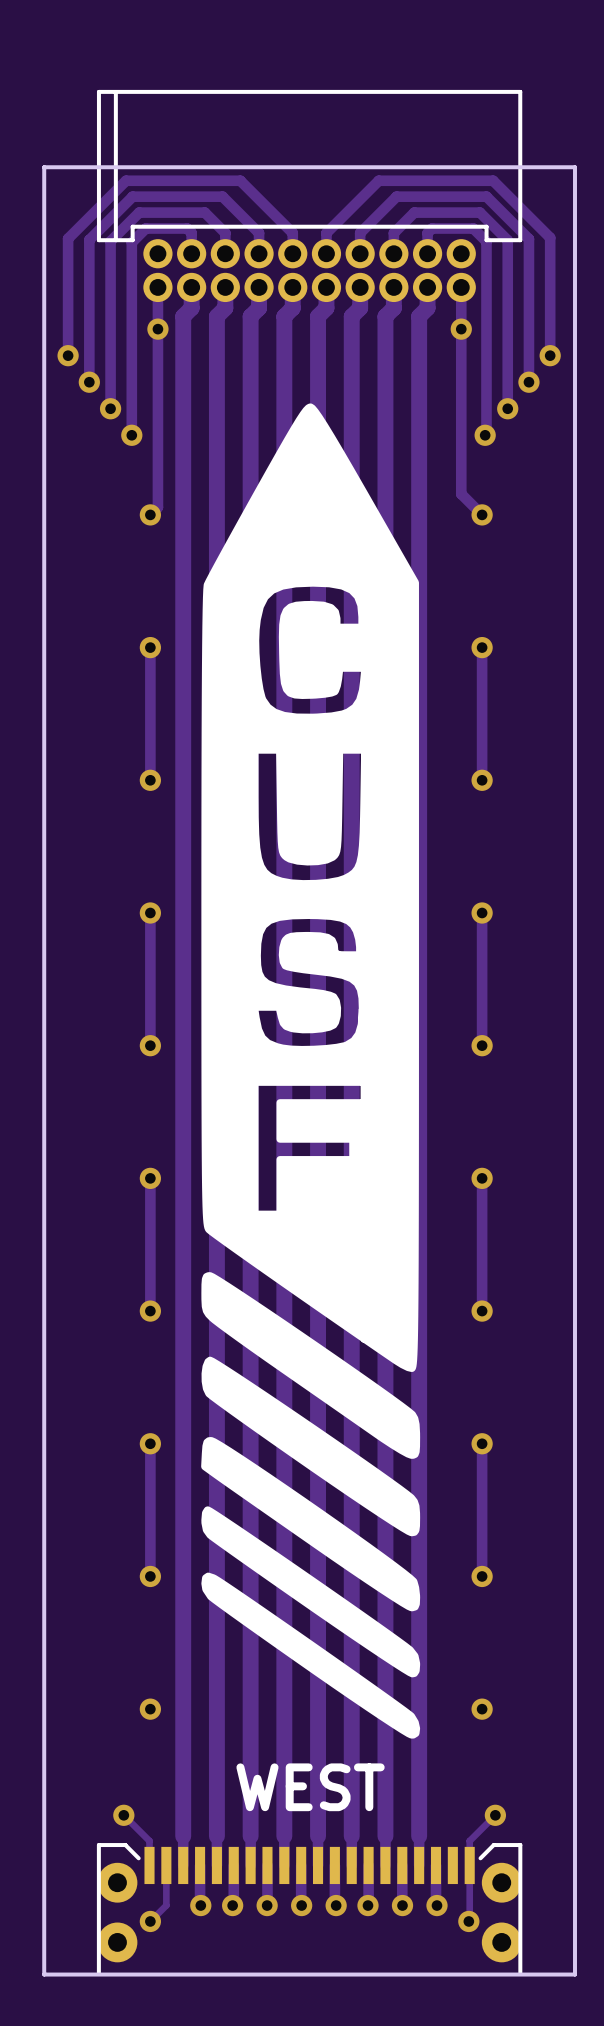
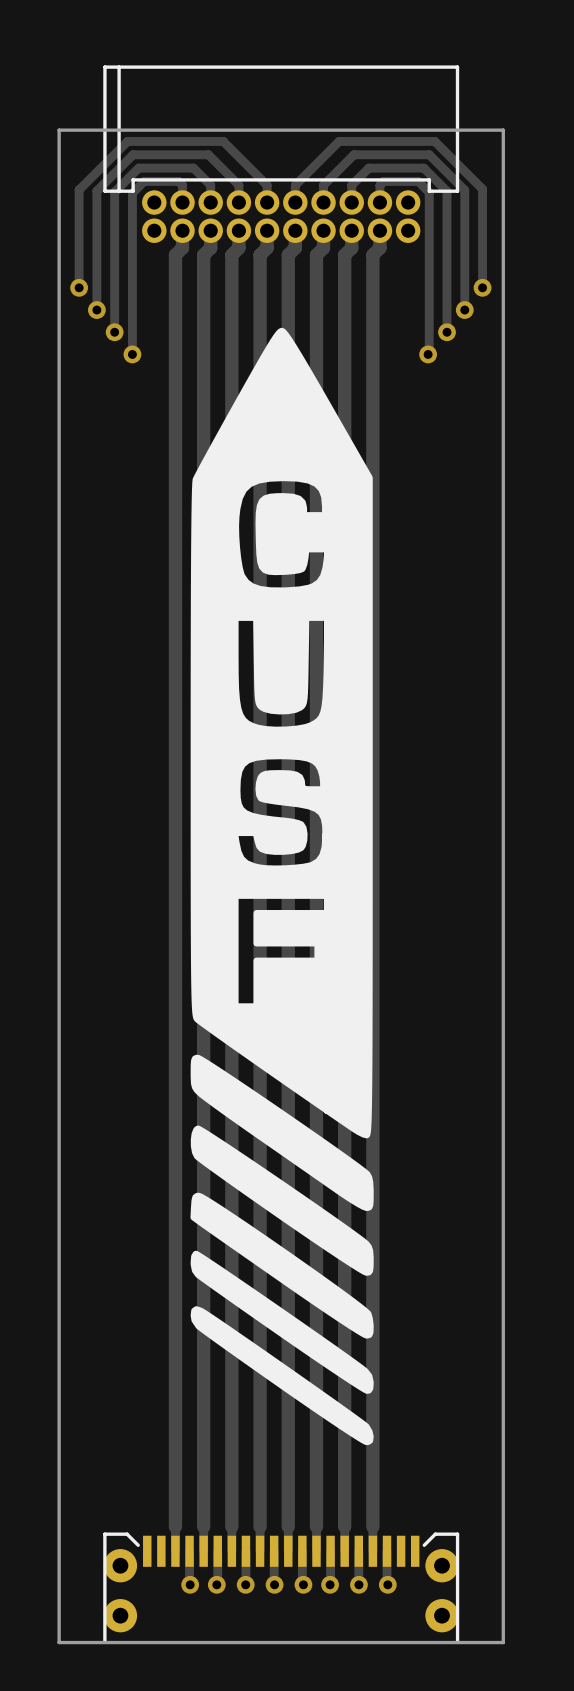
track: (157, 287) (157, 507) (150, 514) -> none
track: (461, 287) (461, 494) (482, 514) -> none
via: (157, 329) -> none
via: (461, 329) -> none
via: (150, 514) -> none
via: (482, 514) -> none
track: (150, 647) (150, 780) -> none
via: (150, 647) -> none
track: (482, 647) (482, 780) -> none
via: (482, 647) -> none
via: (150, 780) -> none
via: (482, 780) -> none
track: (150, 912) (150, 1045) -> none
via: (150, 912) -> none
track: (482, 912) (482, 1045) -> none
via: (482, 912) -> none
via: (150, 1045) -> none
via: (482, 1045) -> none
track: (150, 1178) (150, 1311) -> none
via: (150, 1178) -> none
track: (482, 1178) (482, 1311) -> none
via: (482, 1178) -> none
via: (150, 1311) -> none
via: (482, 1311) -> none
track: (150, 1443) (150, 1576) -> none
via: (150, 1443) -> none
track: (482, 1443) (482, 1576) -> none
via: (482, 1443) -> none
via: (150, 1576) -> none
via: (482, 1576) -> none
via: (150, 1709) -> none
via: (482, 1709) -> none
text: WEST (310, 1787) -> none
track: (123, 1815) (149, 1840) (149, 1865) -> none
via: (123, 1815) -> none
track: (495, 1815) (469, 1840) (468, 1921) -> none
via: (495, 1815) -> none
track: (166, 1865) (166, 1905) (150, 1921) -> none
via: (150, 1921) -> none
via: (468, 1921) -> none

